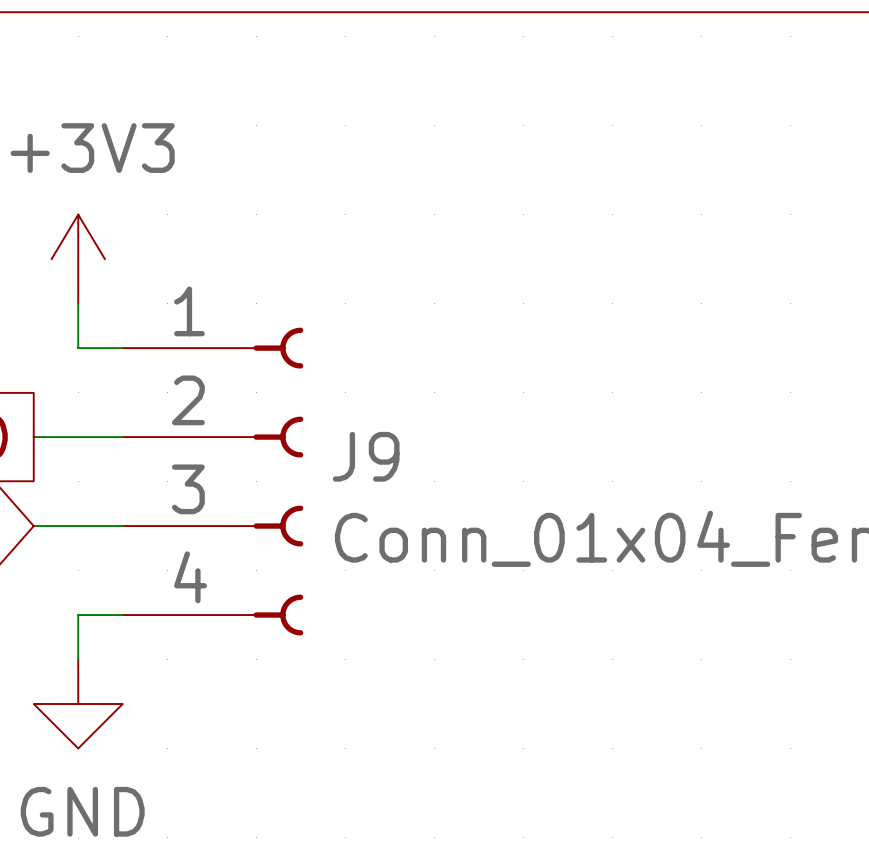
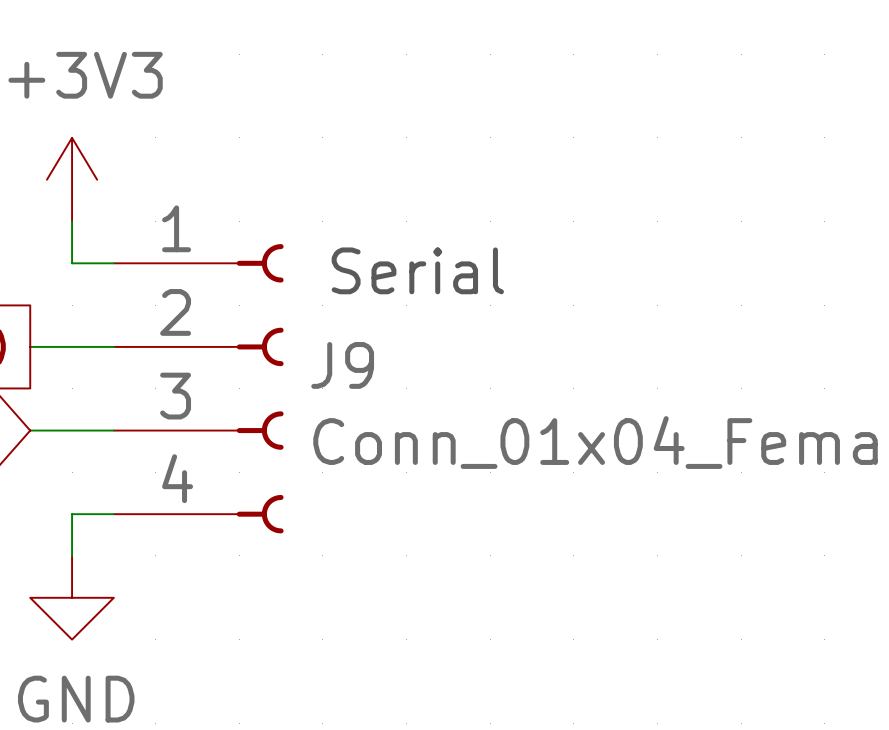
text: none -> Serial (417, 270)

